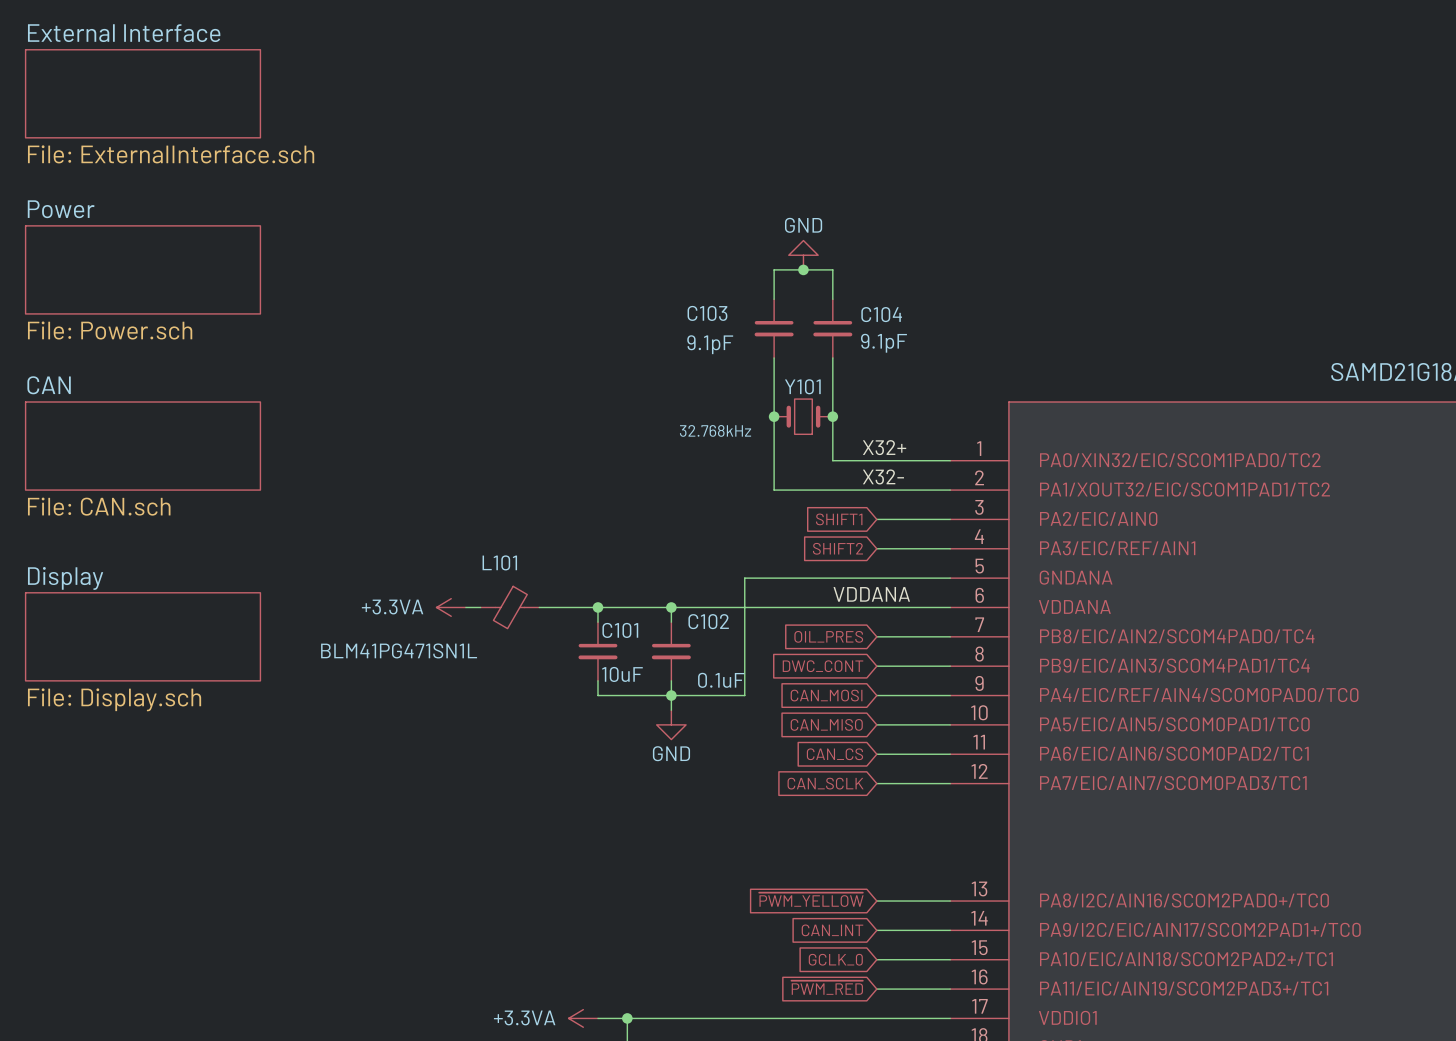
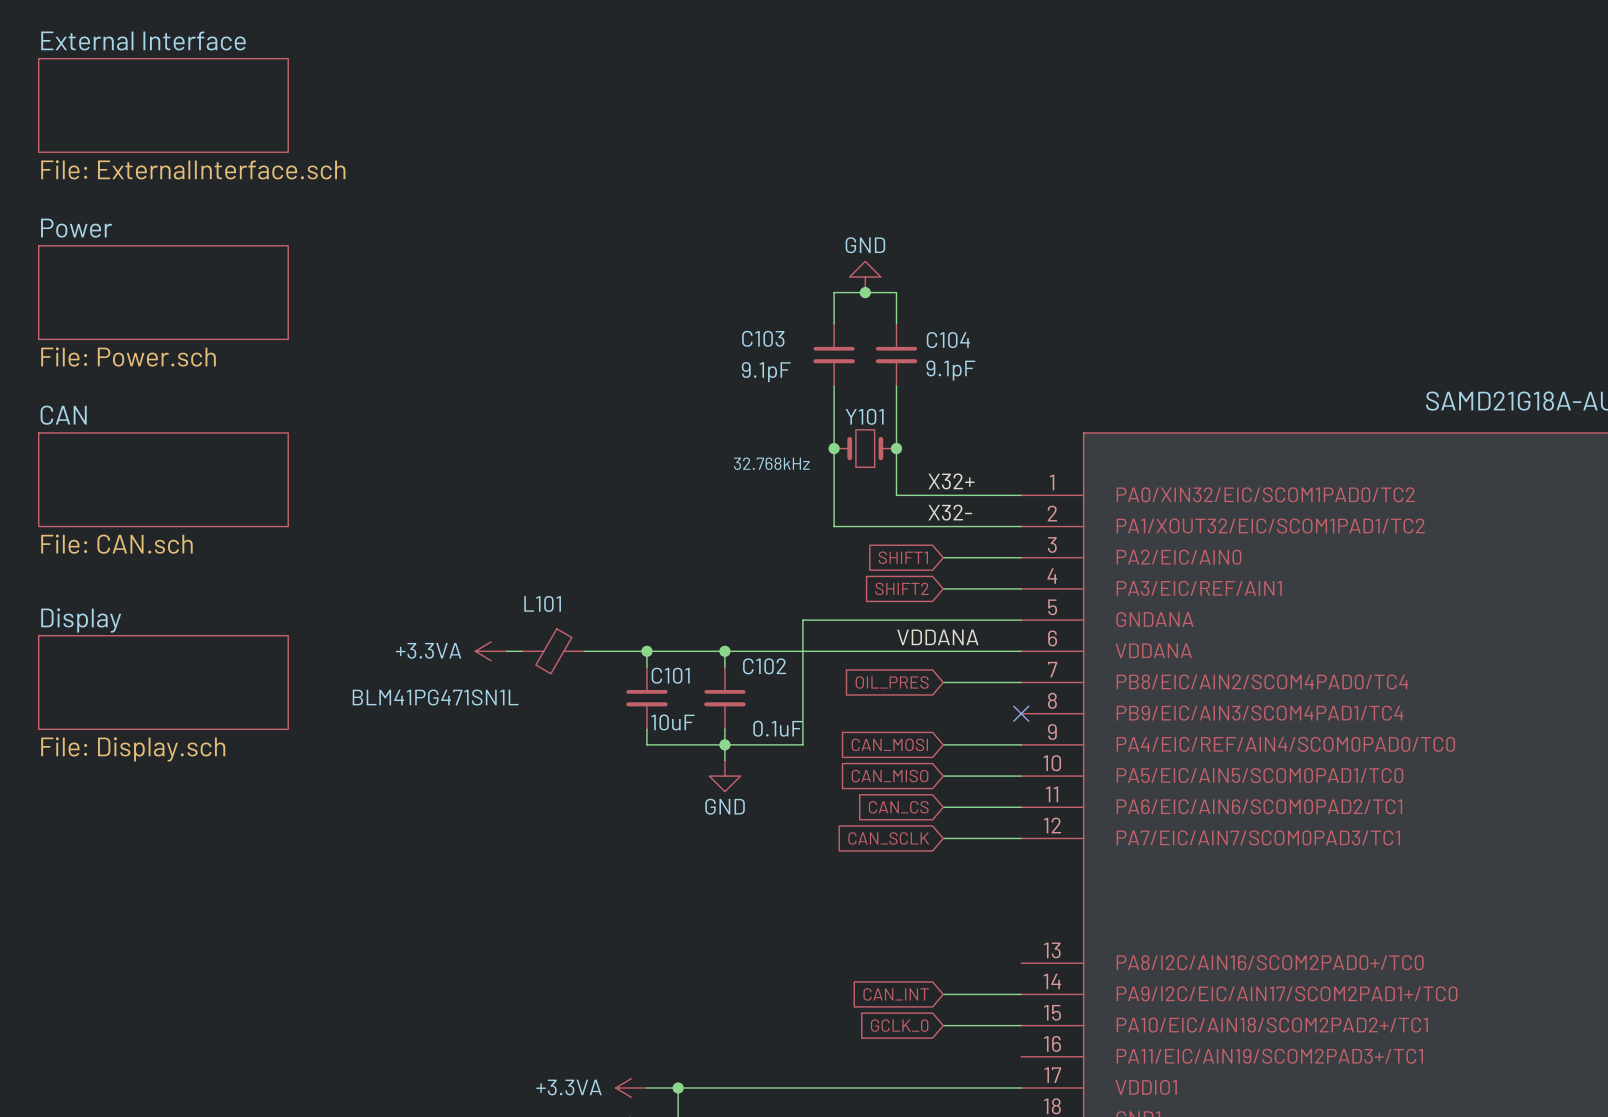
global label: DWC_CONT (823, 666) -> none
wire: (876, 666) (950, 666) -> none
no-connect mark: none -> (1021, 713)
global label: ~{PWM_YELLOW} (811, 899) -> none
wire: (876, 901) (950, 901) -> none
global label: ~{PWM_RED} (827, 987) -> none
wire: (876, 989) (950, 989) -> none

